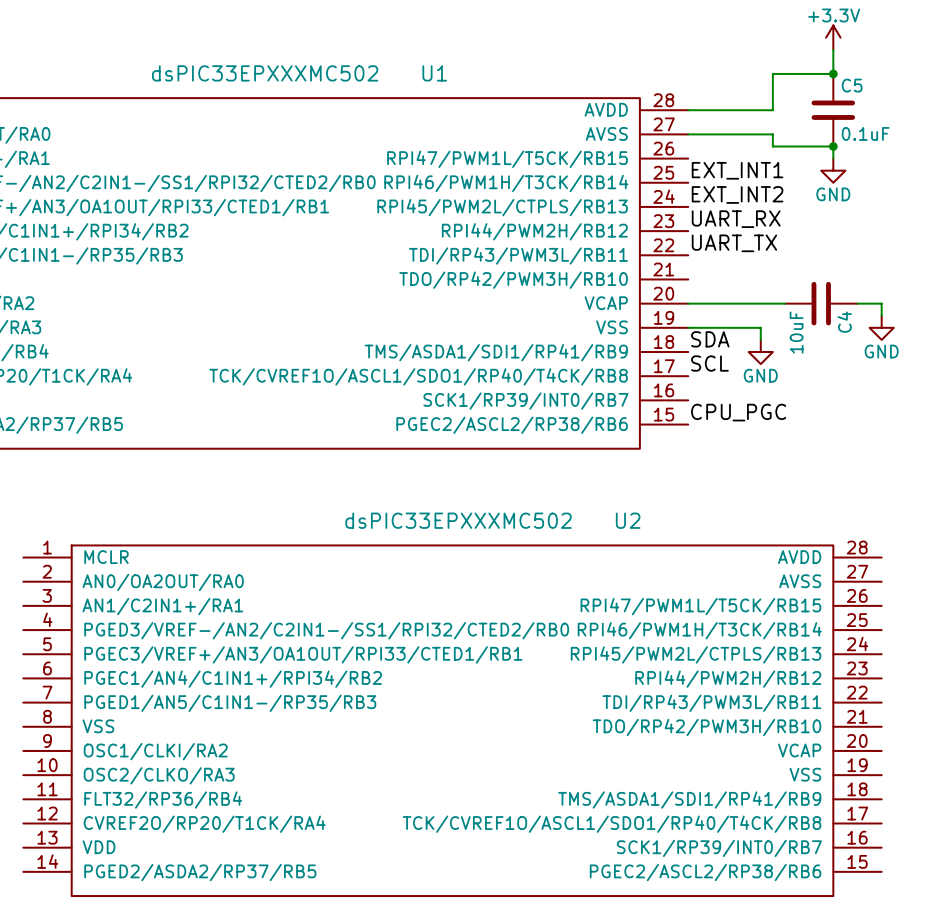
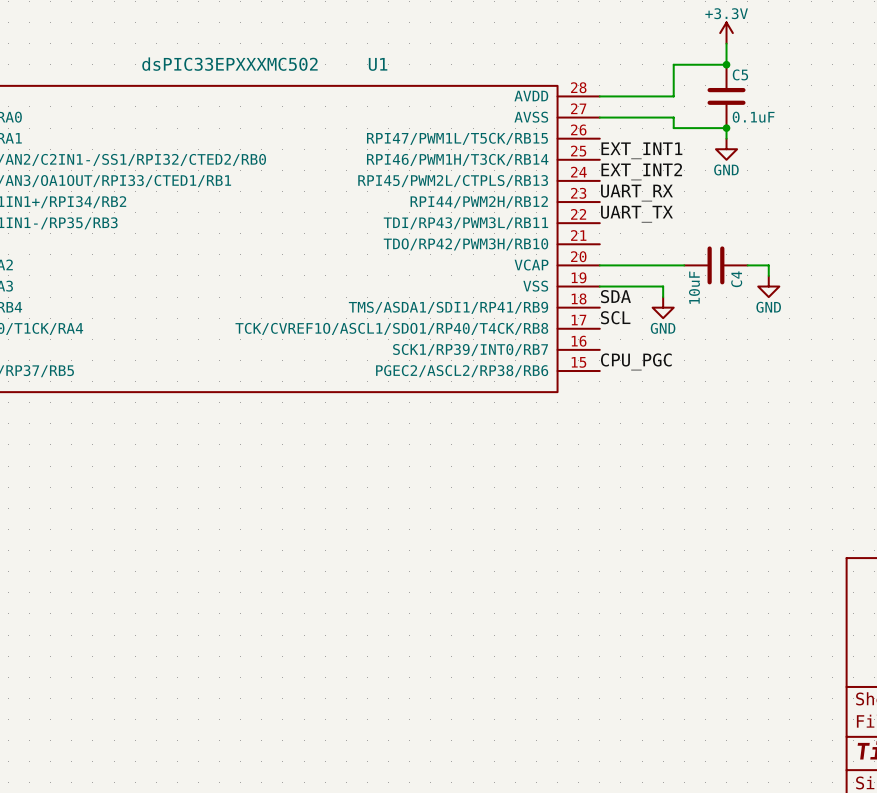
U2: dsPIC33EPXXXMC502 (452, 720) -> none

